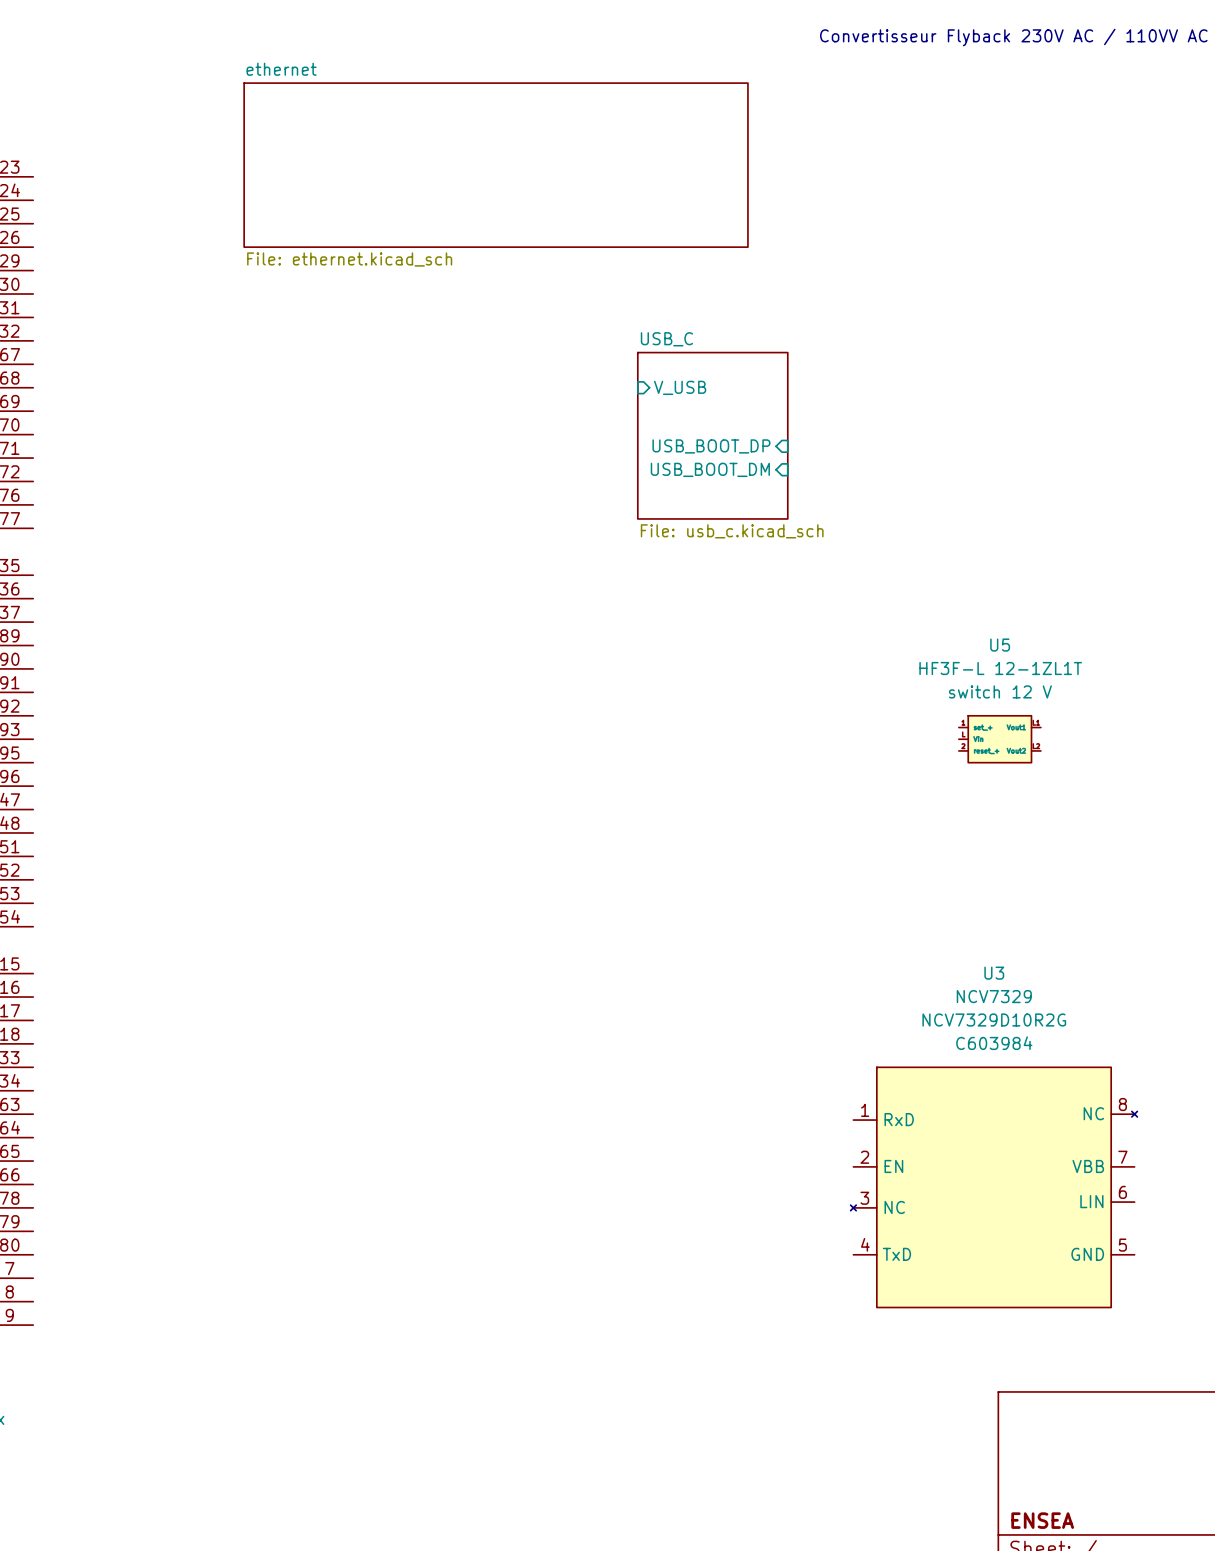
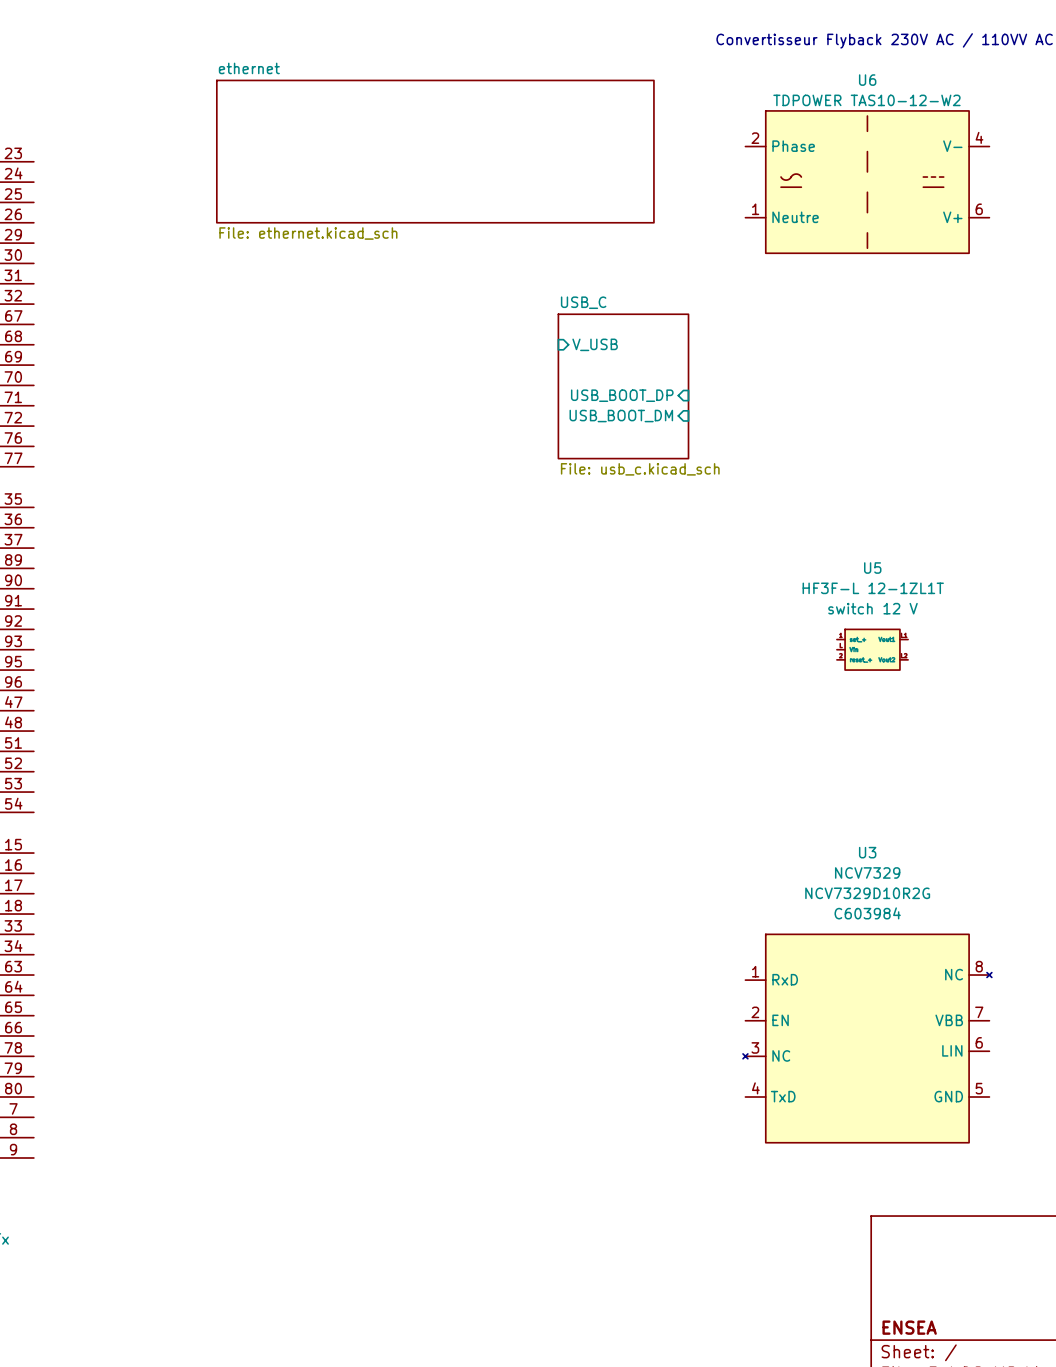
U6: none -> TDPOWER TAS10-12-W2 (867, 182)

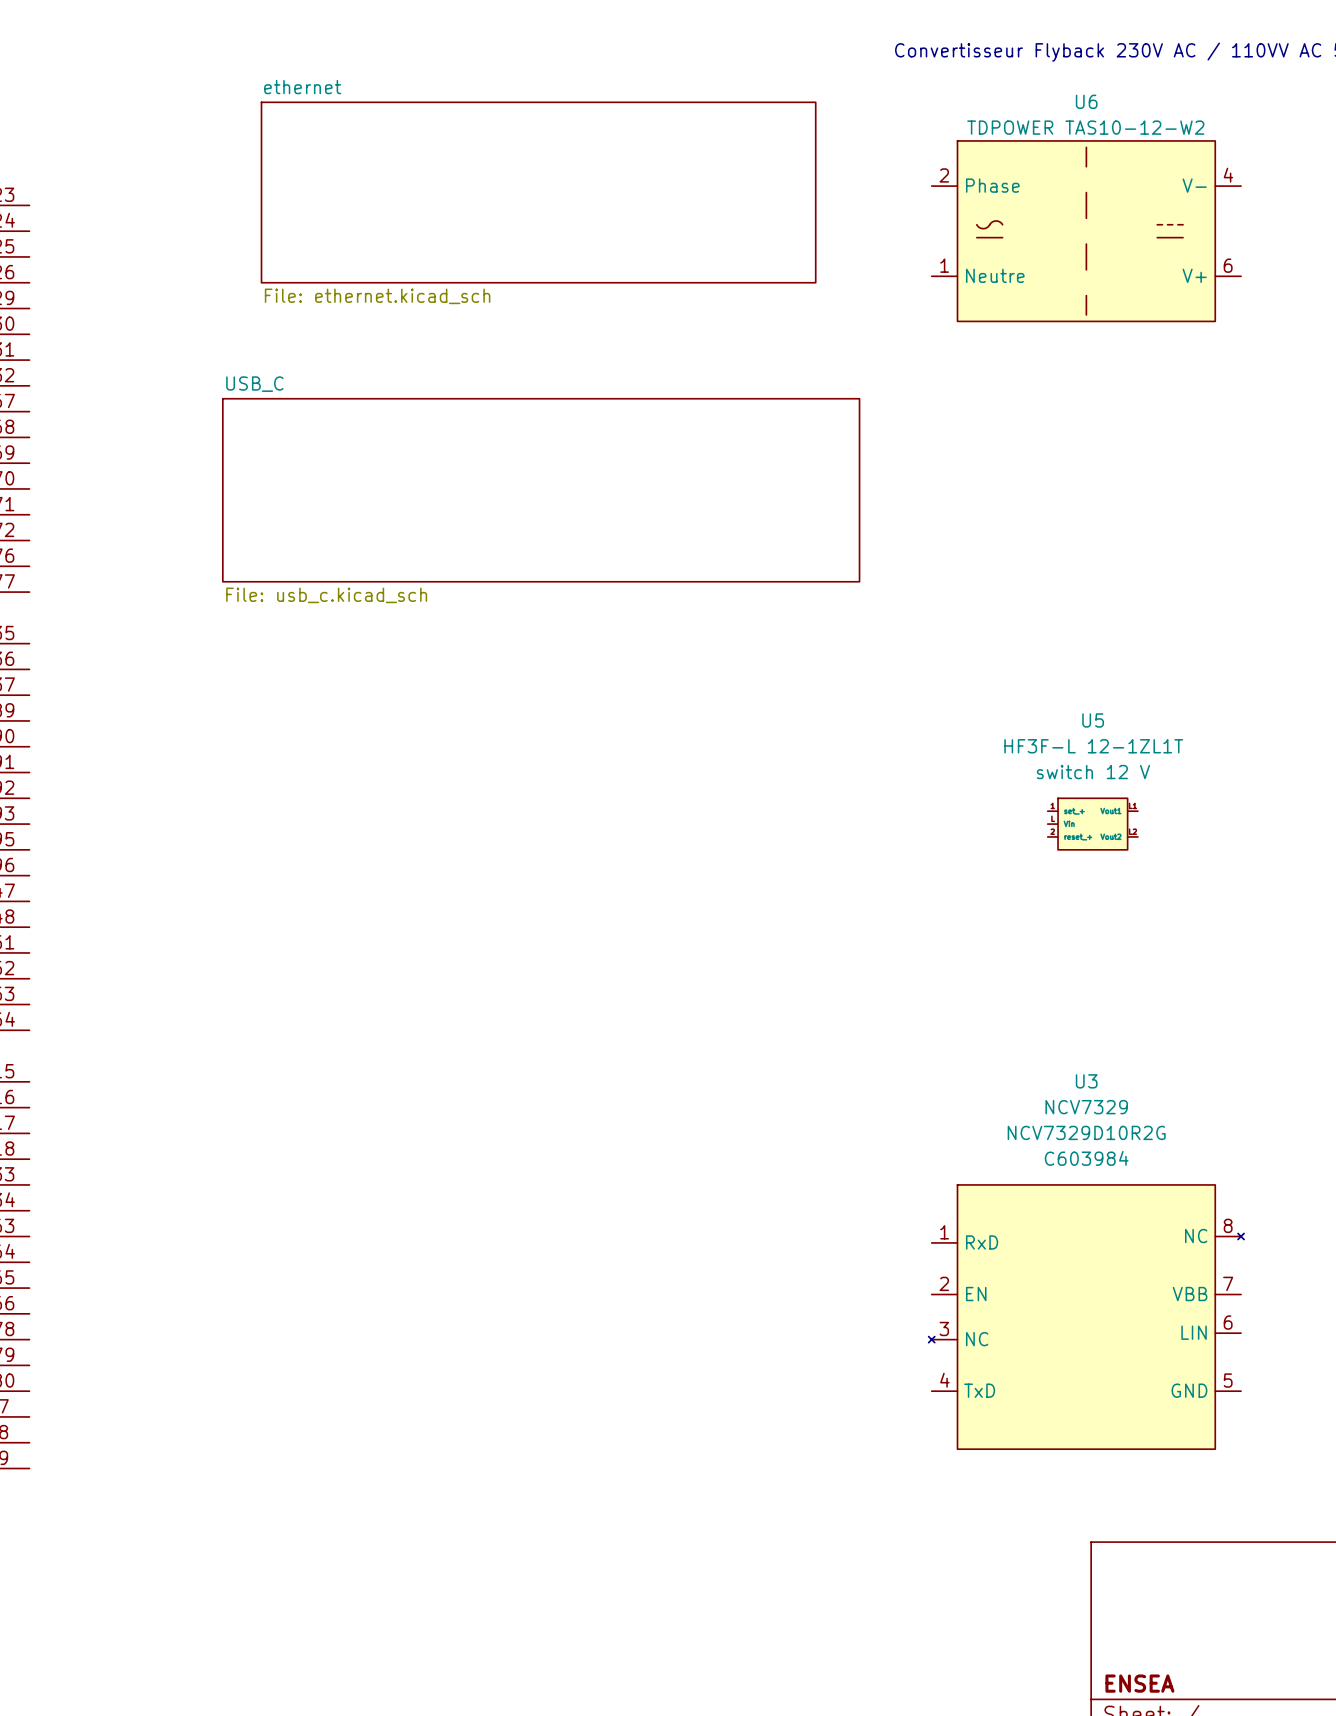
sheet pin: V_USB (595, 344) -> none
sheet USB_C: none -> File: usb_c.kicad_sch (541, 490)
sheet USB_C: File: usb_c.kicad_sch (623, 386) -> none
sheet pin: USB_BOOT_DP (622, 395) -> none
sheet pin: USB_BOOT_DM (621, 416) -> none

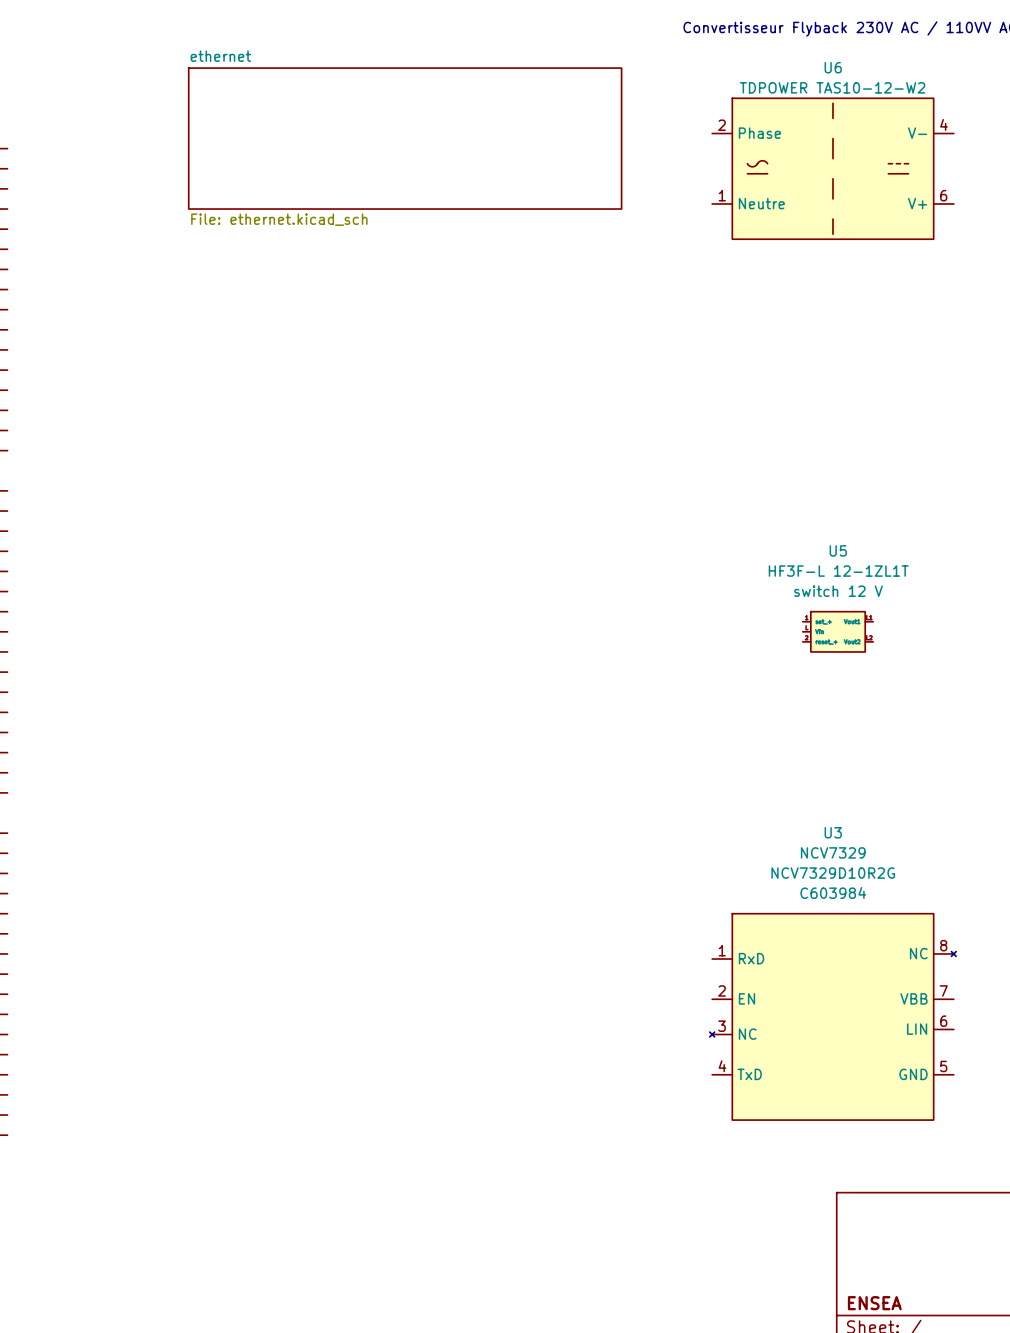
sheet USB_C: File: usb_c.kicad_sch (541, 490) -> none

